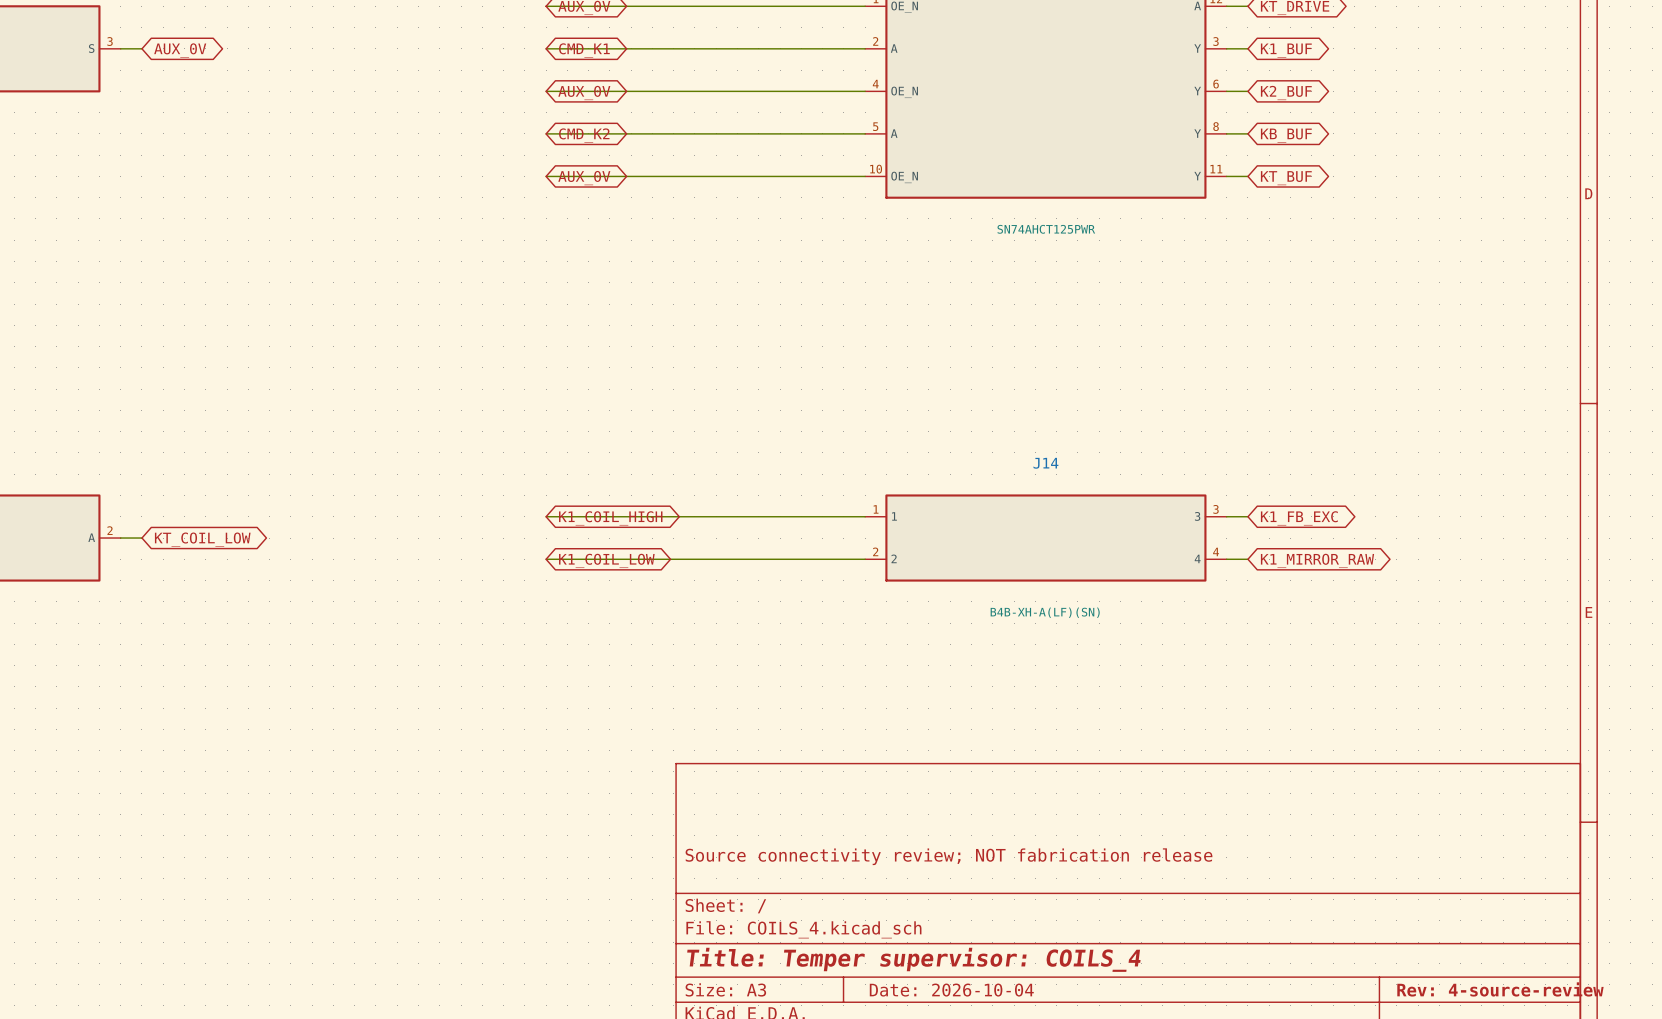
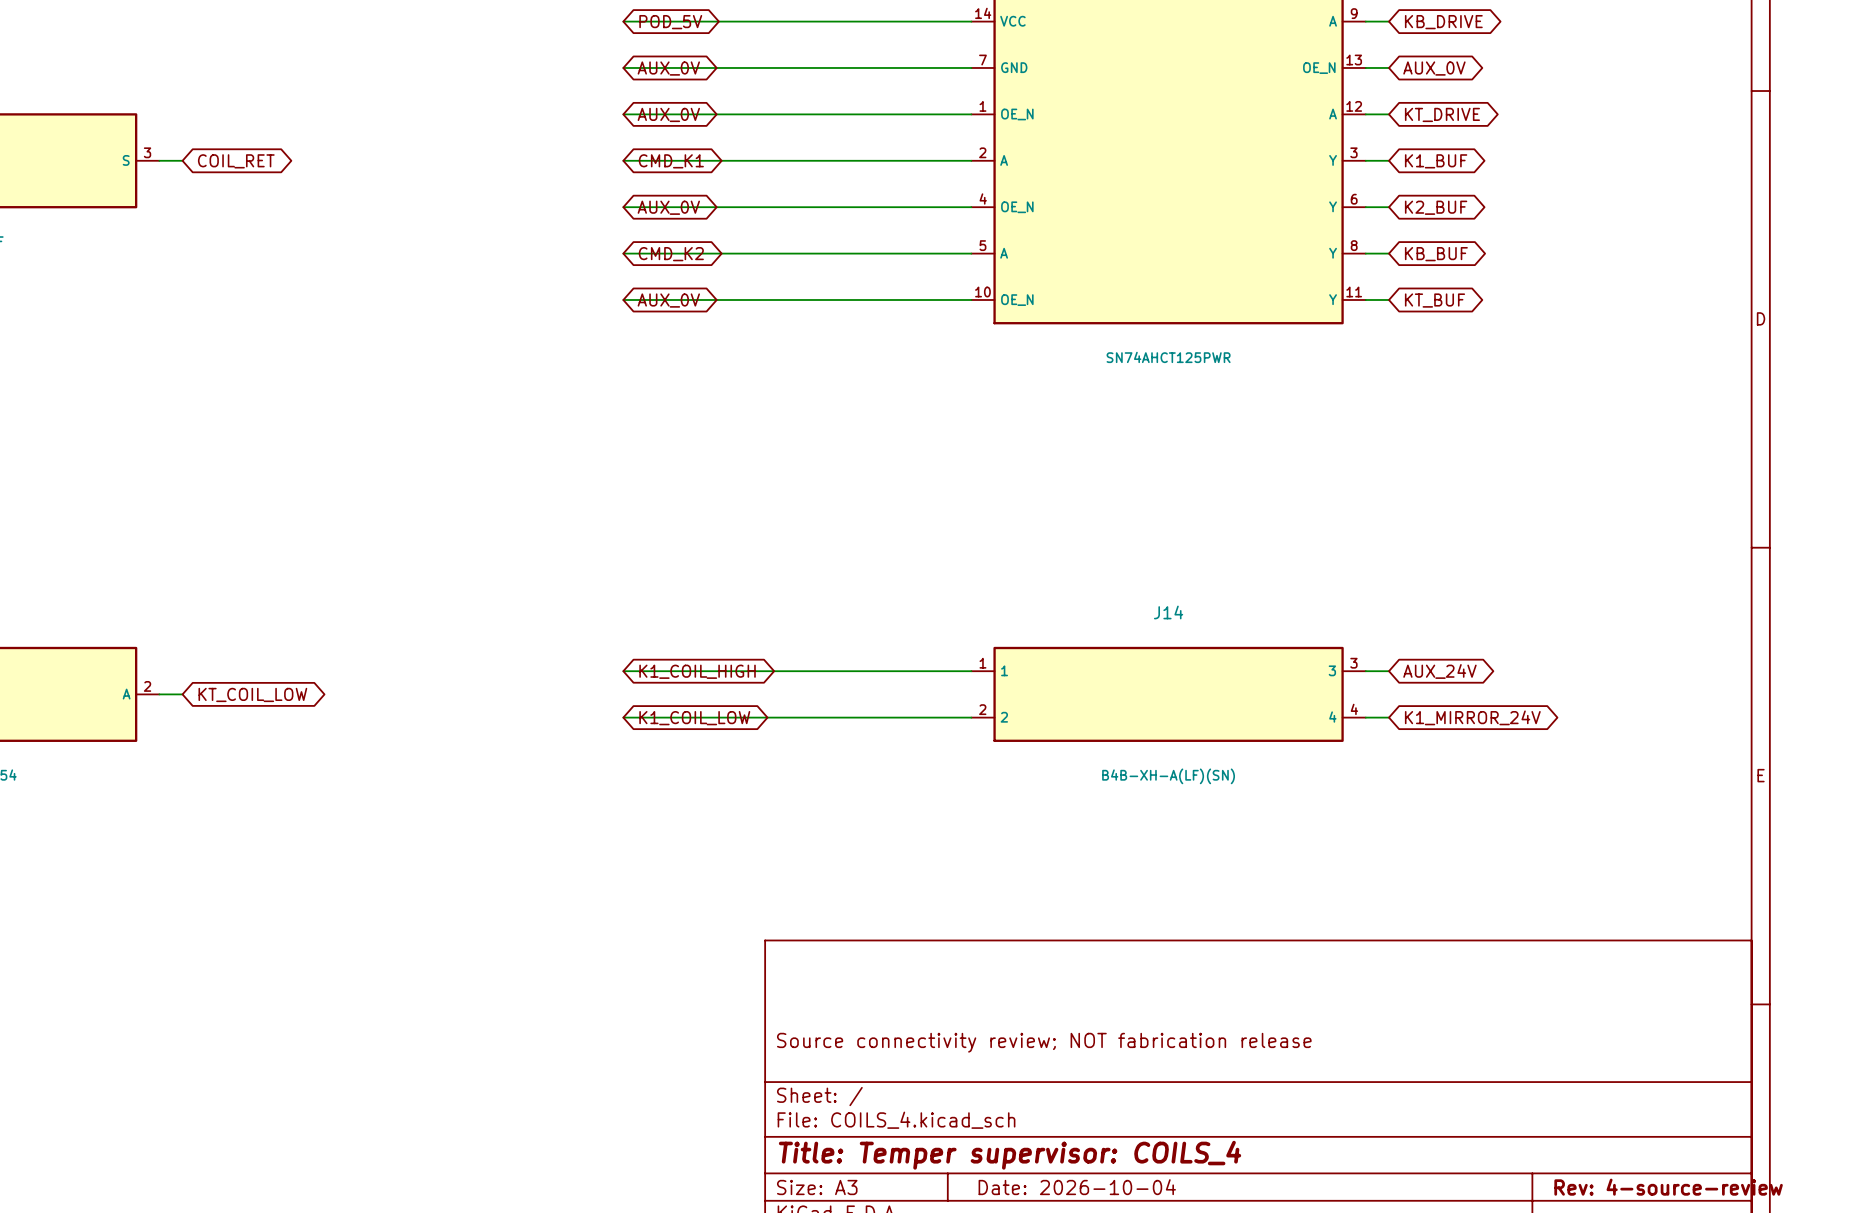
global label: AUX_0V (180, 50) -> COIL_RET (236, 161)
global label: K1_FB_EXC (1299, 518) -> AUX_24V (1439, 671)
global label: K1_MIRROR_RAW (1317, 560) -> K1_MIRROR_24V (1472, 717)

